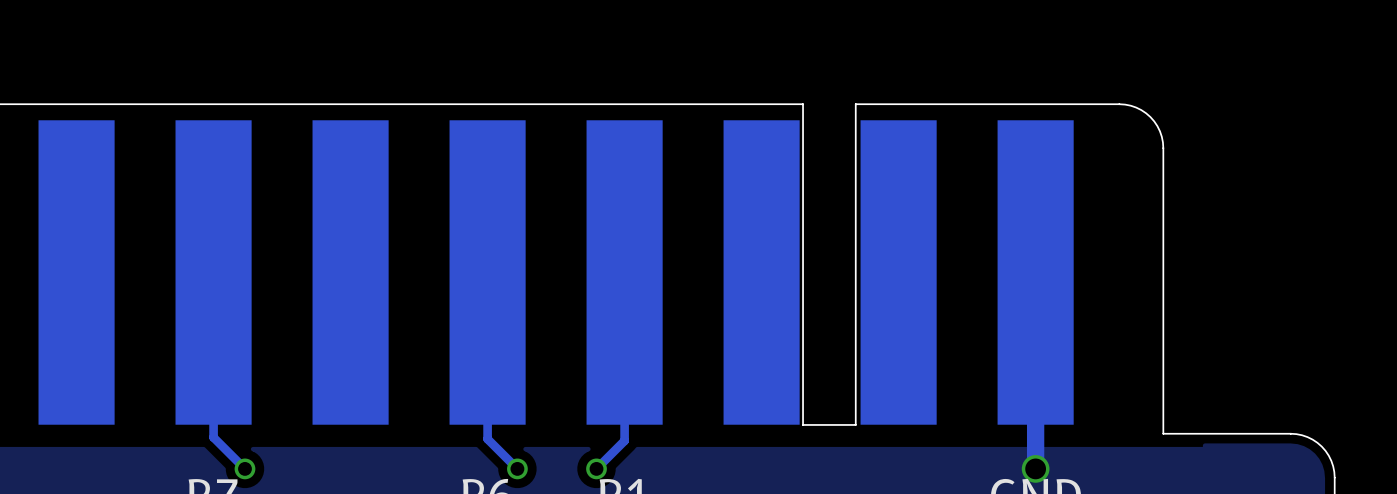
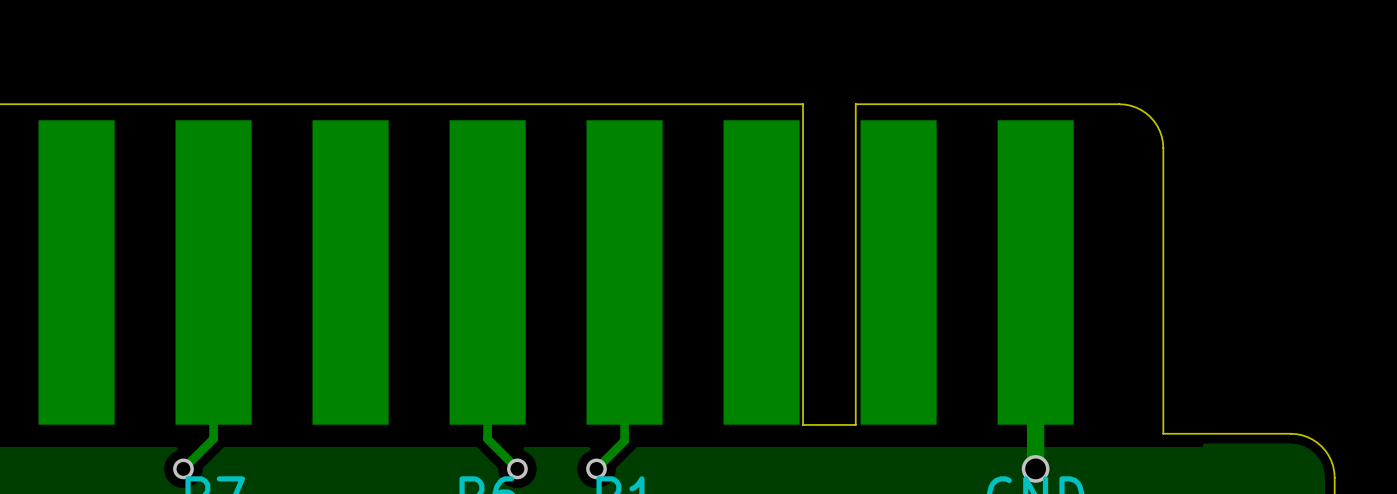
track: (213, 437) (244, 468) -> (213, 437) (183, 468)
via position: (244, 468) -> (183, 468)

